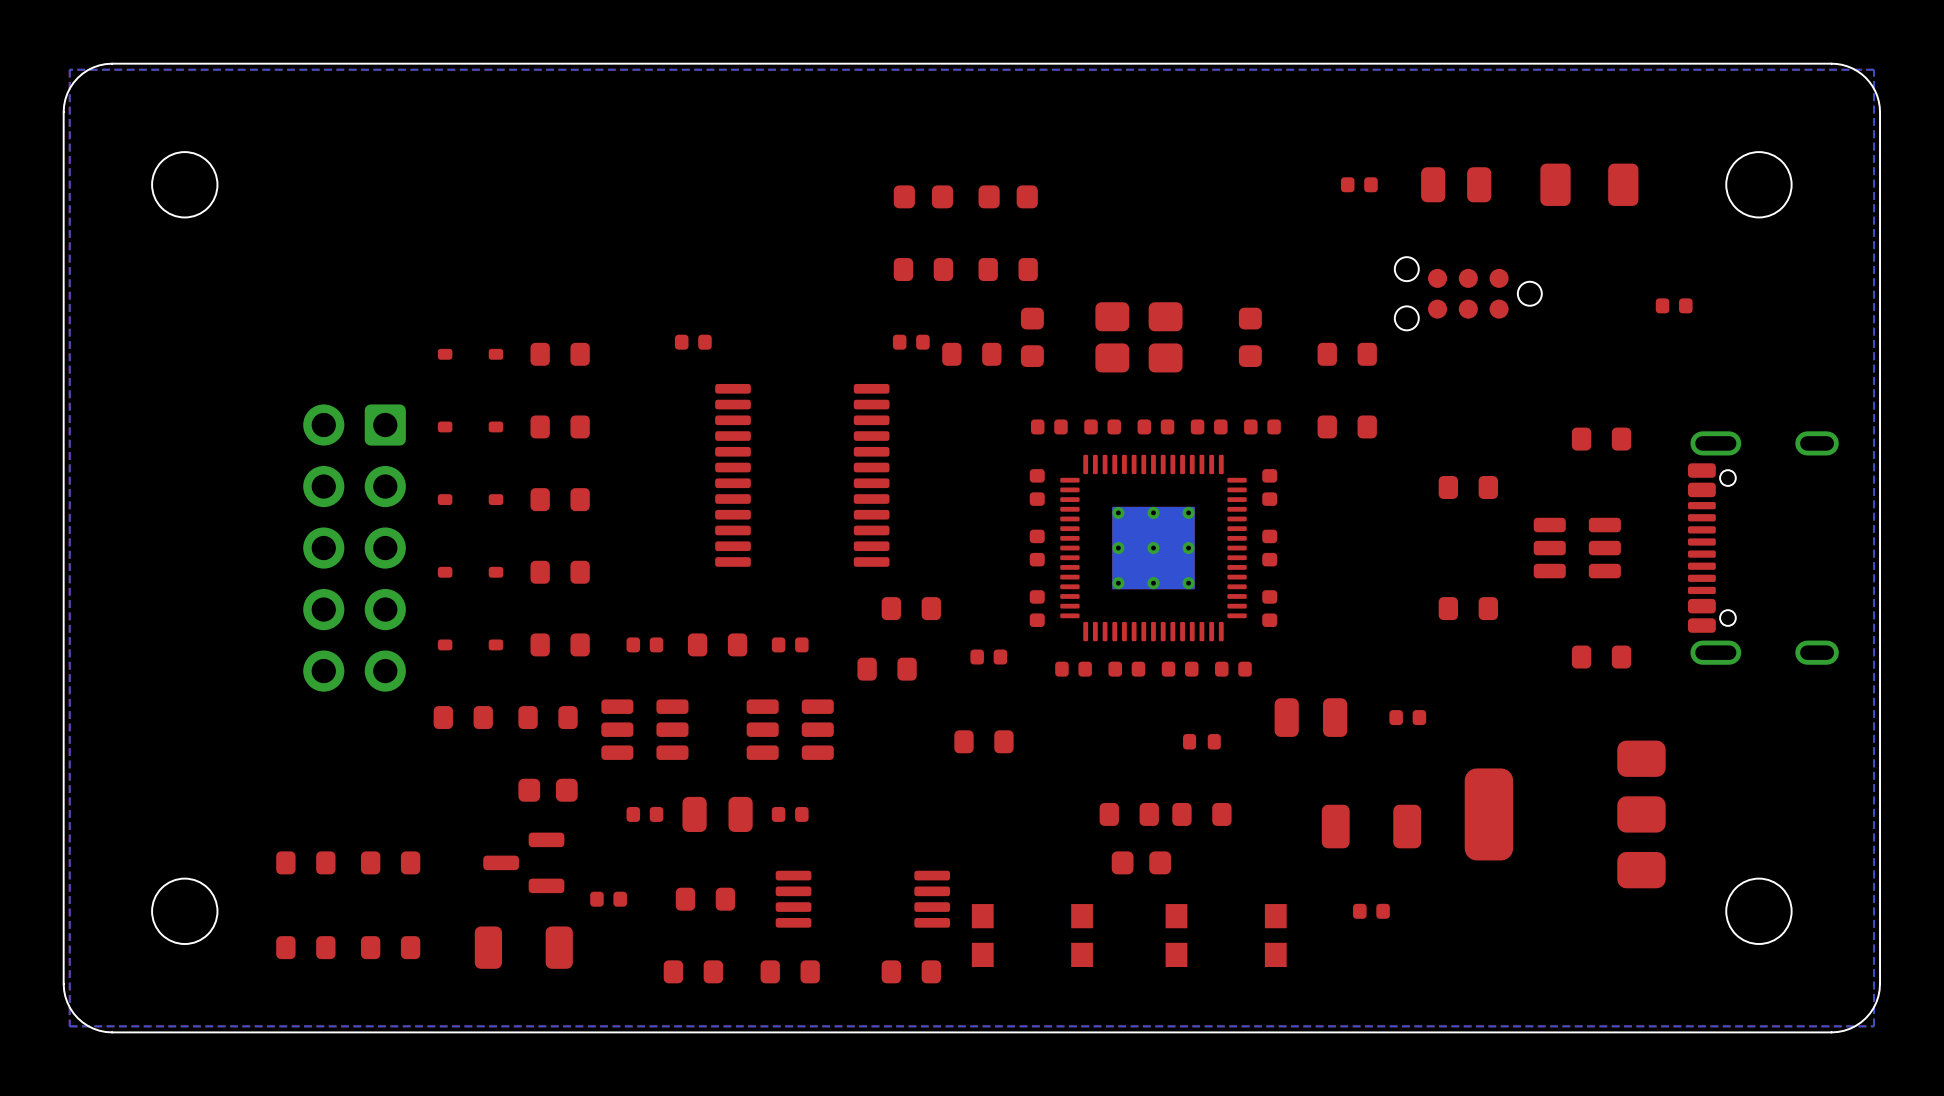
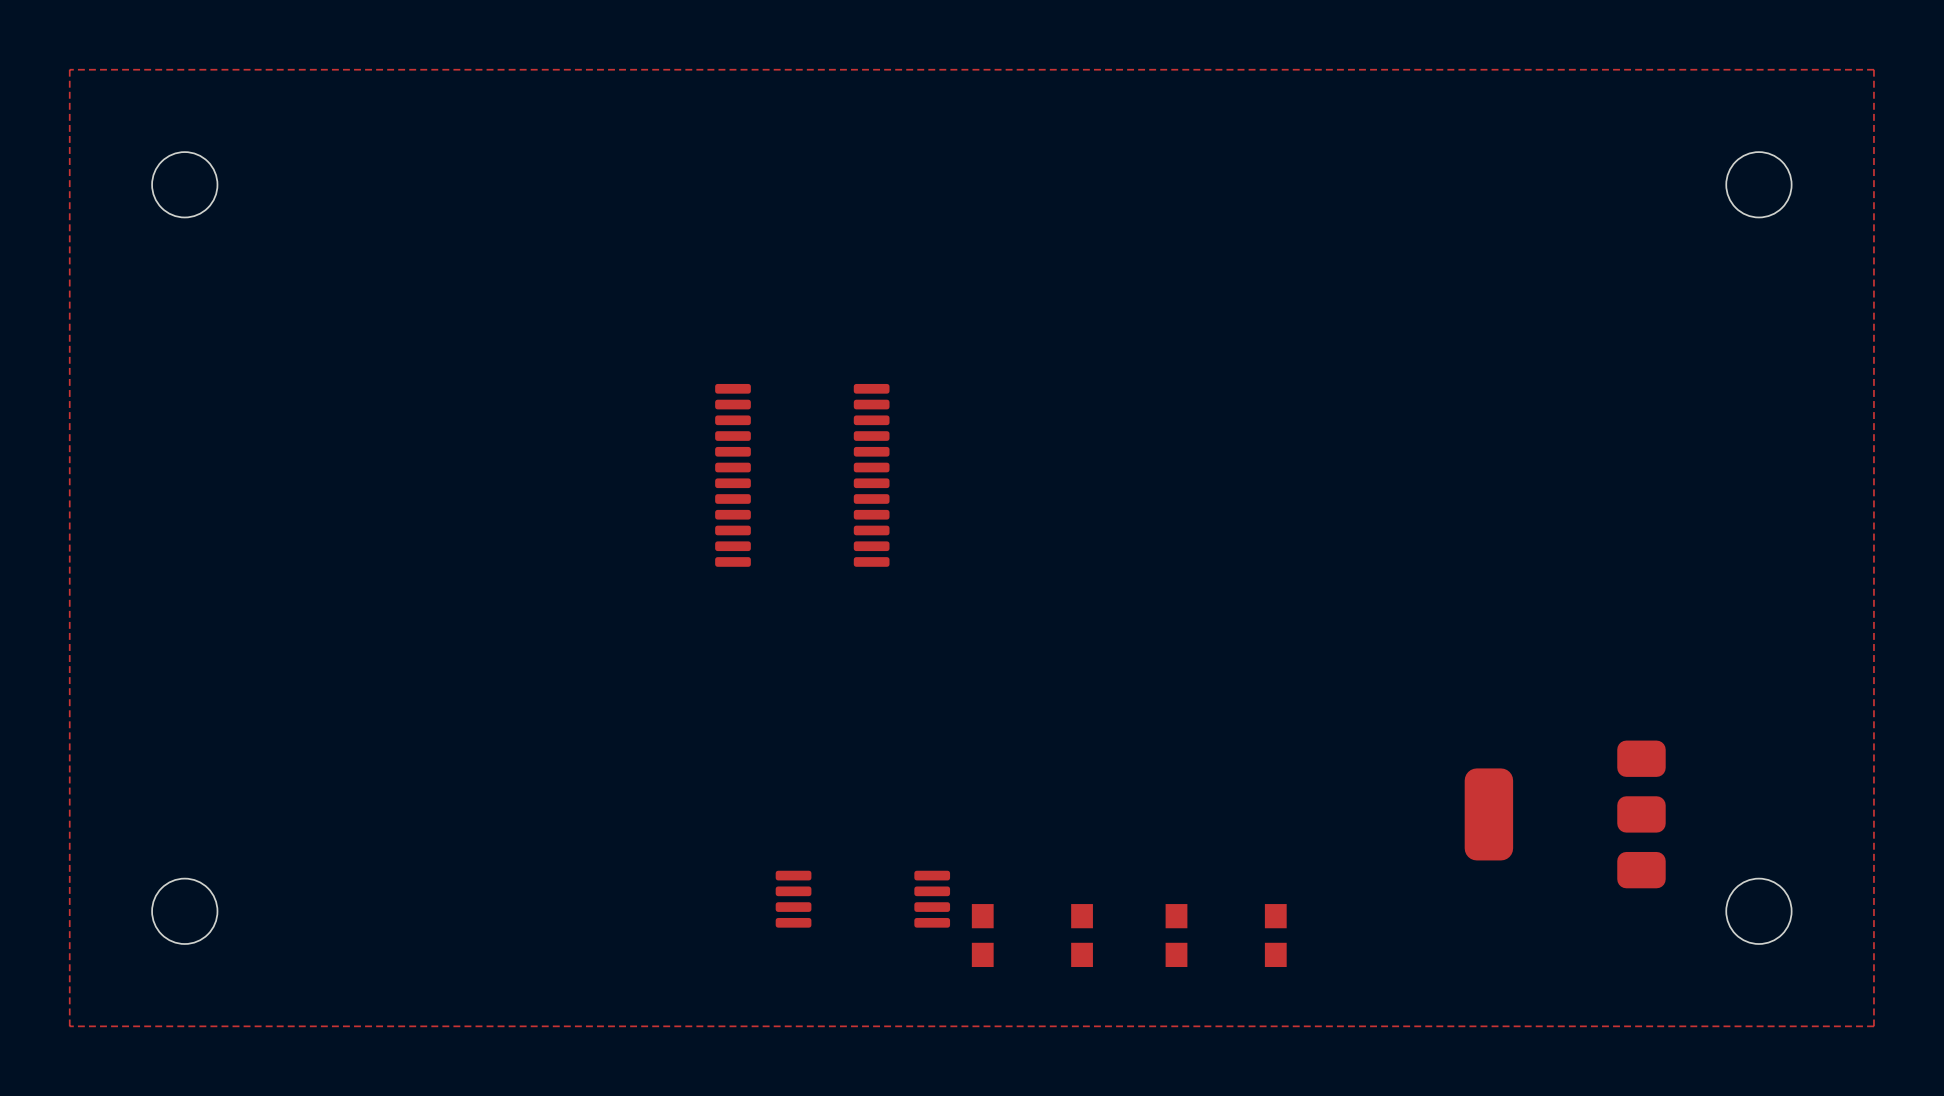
board edge: (1831, 63) (112, 63) (99, 65) (87, 70) (77, 77) (70, 87) (65, 99) (63, 112) (63, 983) (65, 996) (70, 1008) (77, 1018) (87, 1025) (99, 1030) (112, 1032) (1831, 1032) (1844, 1030) (1855, 1025) (1865, 1018) (1873, 1008) (1878, 996) (1880, 983) (1880, 112) (1875, 91) (1865, 77) (1852, 68) (1831, 63) -> none
bottom zone outline: (1873, 69) (69, 69) (69, 1026) (1873, 1026) (1873, 69) -> none
part: (1359, 184) -> none
part: (1456, 184) -> none
part: (1589, 184) -> none
part: (923, 196) -> none
part: (1008, 196) -> none
part: (923, 269) -> none
part: (1008, 269) -> none
part: (1468, 293) -> none
part: (1674, 305) -> none
part: (1032, 337) -> none
part: (1138, 337) -> none
part: (1250, 337) -> none
part: (693, 342) -> none
part: (911, 342) -> none
part: (470, 354) -> none
part: (560, 354) -> none
part: (971, 354) -> none
part: (1347, 354) -> none
part: (470, 426) -> none
part: (560, 426) -> none
part: (1049, 426) -> none
part: (1102, 426) -> none
part: (1155, 426) -> none
part: (1209, 426) -> none
part: (1262, 426) -> none
part: (1347, 426) -> none
part: (1601, 439) -> none
part: (1037, 487) -> none
part: (1269, 487) -> none
part: (1468, 487) -> none
part: (470, 499) -> none
part: (560, 499) -> none
part: (354, 548) -> none
part: (1037, 548) -> none
part: (1153, 548) -> none
part: (1269, 548) -> none
part: (1577, 548) -> none
part: (1763, 548) -> none
part: (470, 572) -> none
part: (560, 572) -> none
part: (911, 608) -> none
part: (1037, 608) -> none
part: (1269, 608) -> none
part: (1468, 608) -> none
part: (470, 644) -> none
part: (560, 644) -> none
part: (644, 644) -> none
part: (717, 644) -> none
part: (790, 644) -> none
part: (988, 657) -> none
part: (1601, 657) -> none
part: (887, 669) -> none
part: (1073, 669) -> none
part: (1126, 669) -> none
part: (1180, 669) -> none
part: (1233, 669) -> none
part: (463, 717) -> none
part: (548, 717) -> none
part: (1310, 717) -> none
part: (1407, 717) -> none
part: (644, 729) -> none
part: (790, 729) -> none
part: (983, 741) -> none
part: (1201, 741) -> none
part: (548, 790) -> none
part: (644, 814) -> none
part: (717, 814) -> none
part: (790, 814) -> none
part: (1129, 814) -> none
part: (1201, 814) -> none
part: (1371, 826) -> none
part: (305, 862) -> none
part: (390, 862) -> none
part: (523, 862) -> none
part: (1141, 862) -> none
part: (608, 899) -> none
part: (705, 899) -> none
part: (1371, 911) -> none
part: (305, 947) -> none
part: (390, 947) -> none
part: (523, 947) -> none
part: (693, 971) -> none
part: (790, 971) -> none
part: (911, 971) -> none

